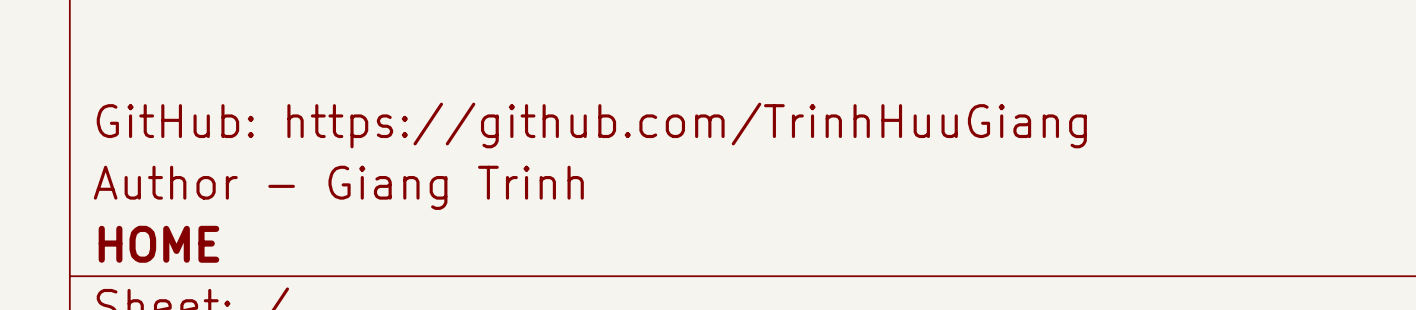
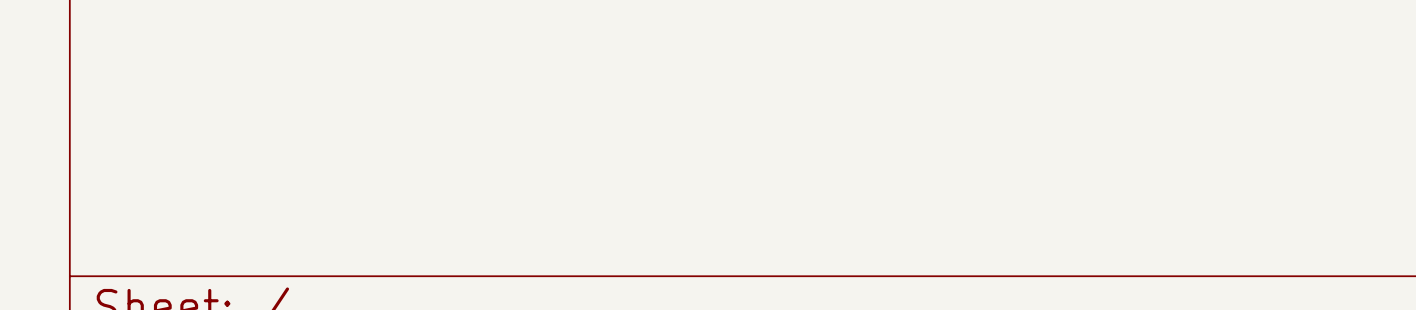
title block: GitHub: https://github.com/TrinhHuuGiang (591, 125) -> none
title block: Author - Giang Trinh (338, 187) -> none
title block: HOME (158, 244) -> none

